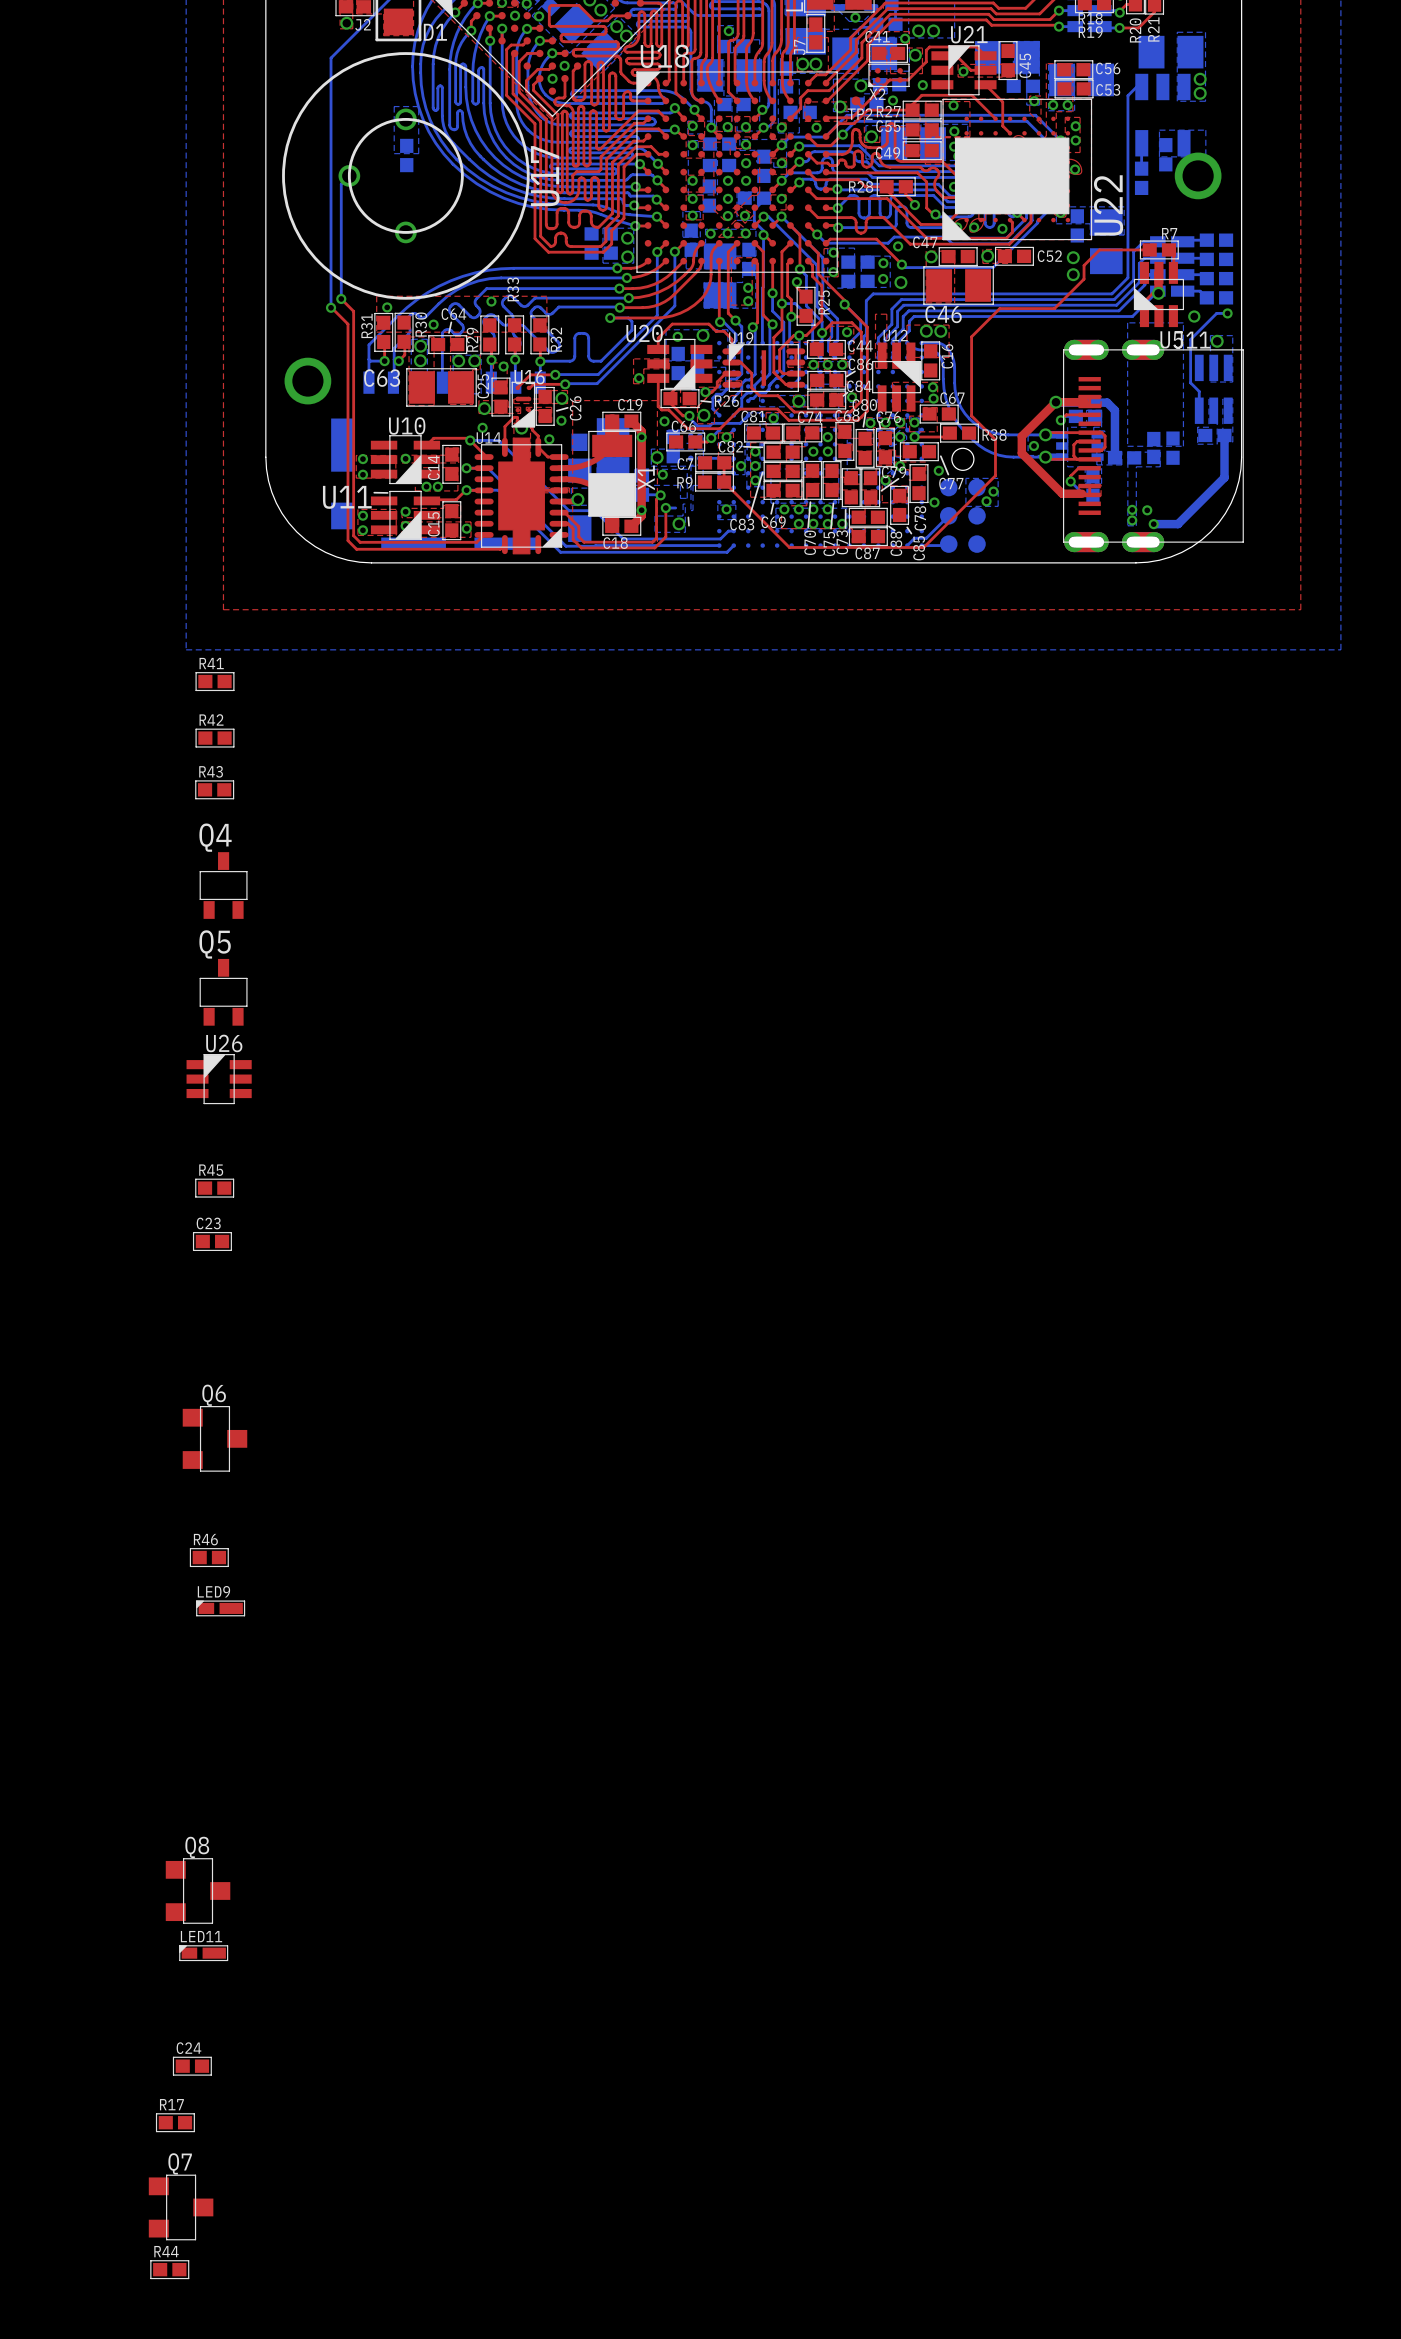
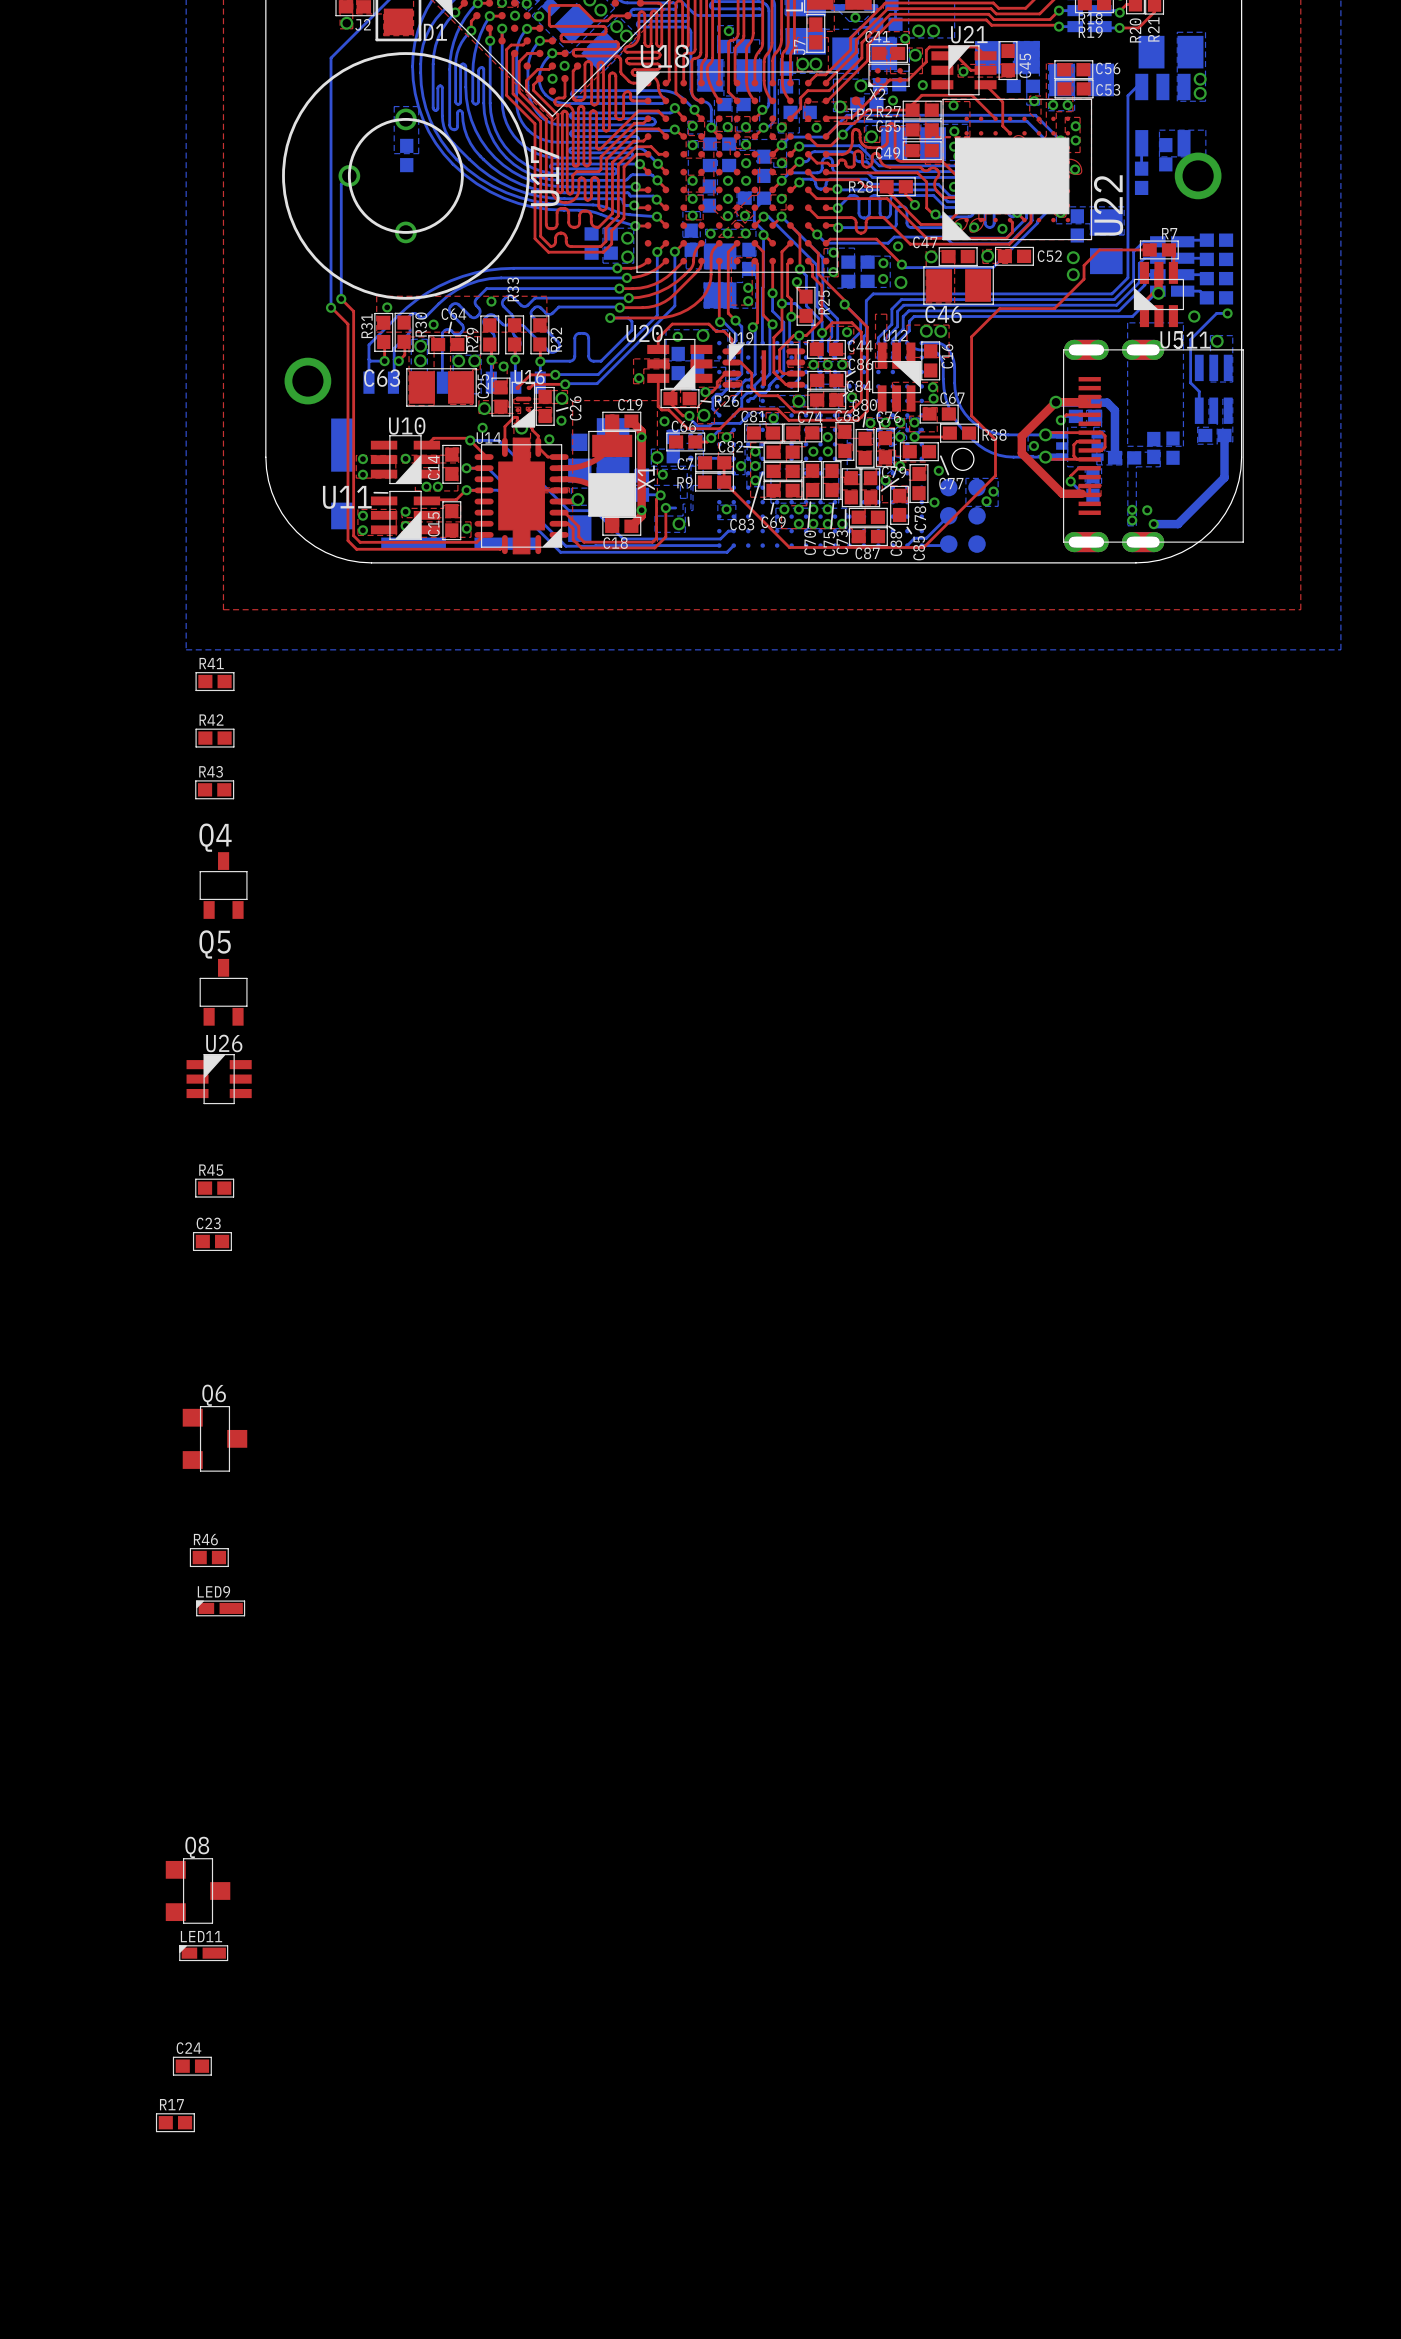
Q7: (181, 2207) -> none
R44: (169, 2269) -> none

